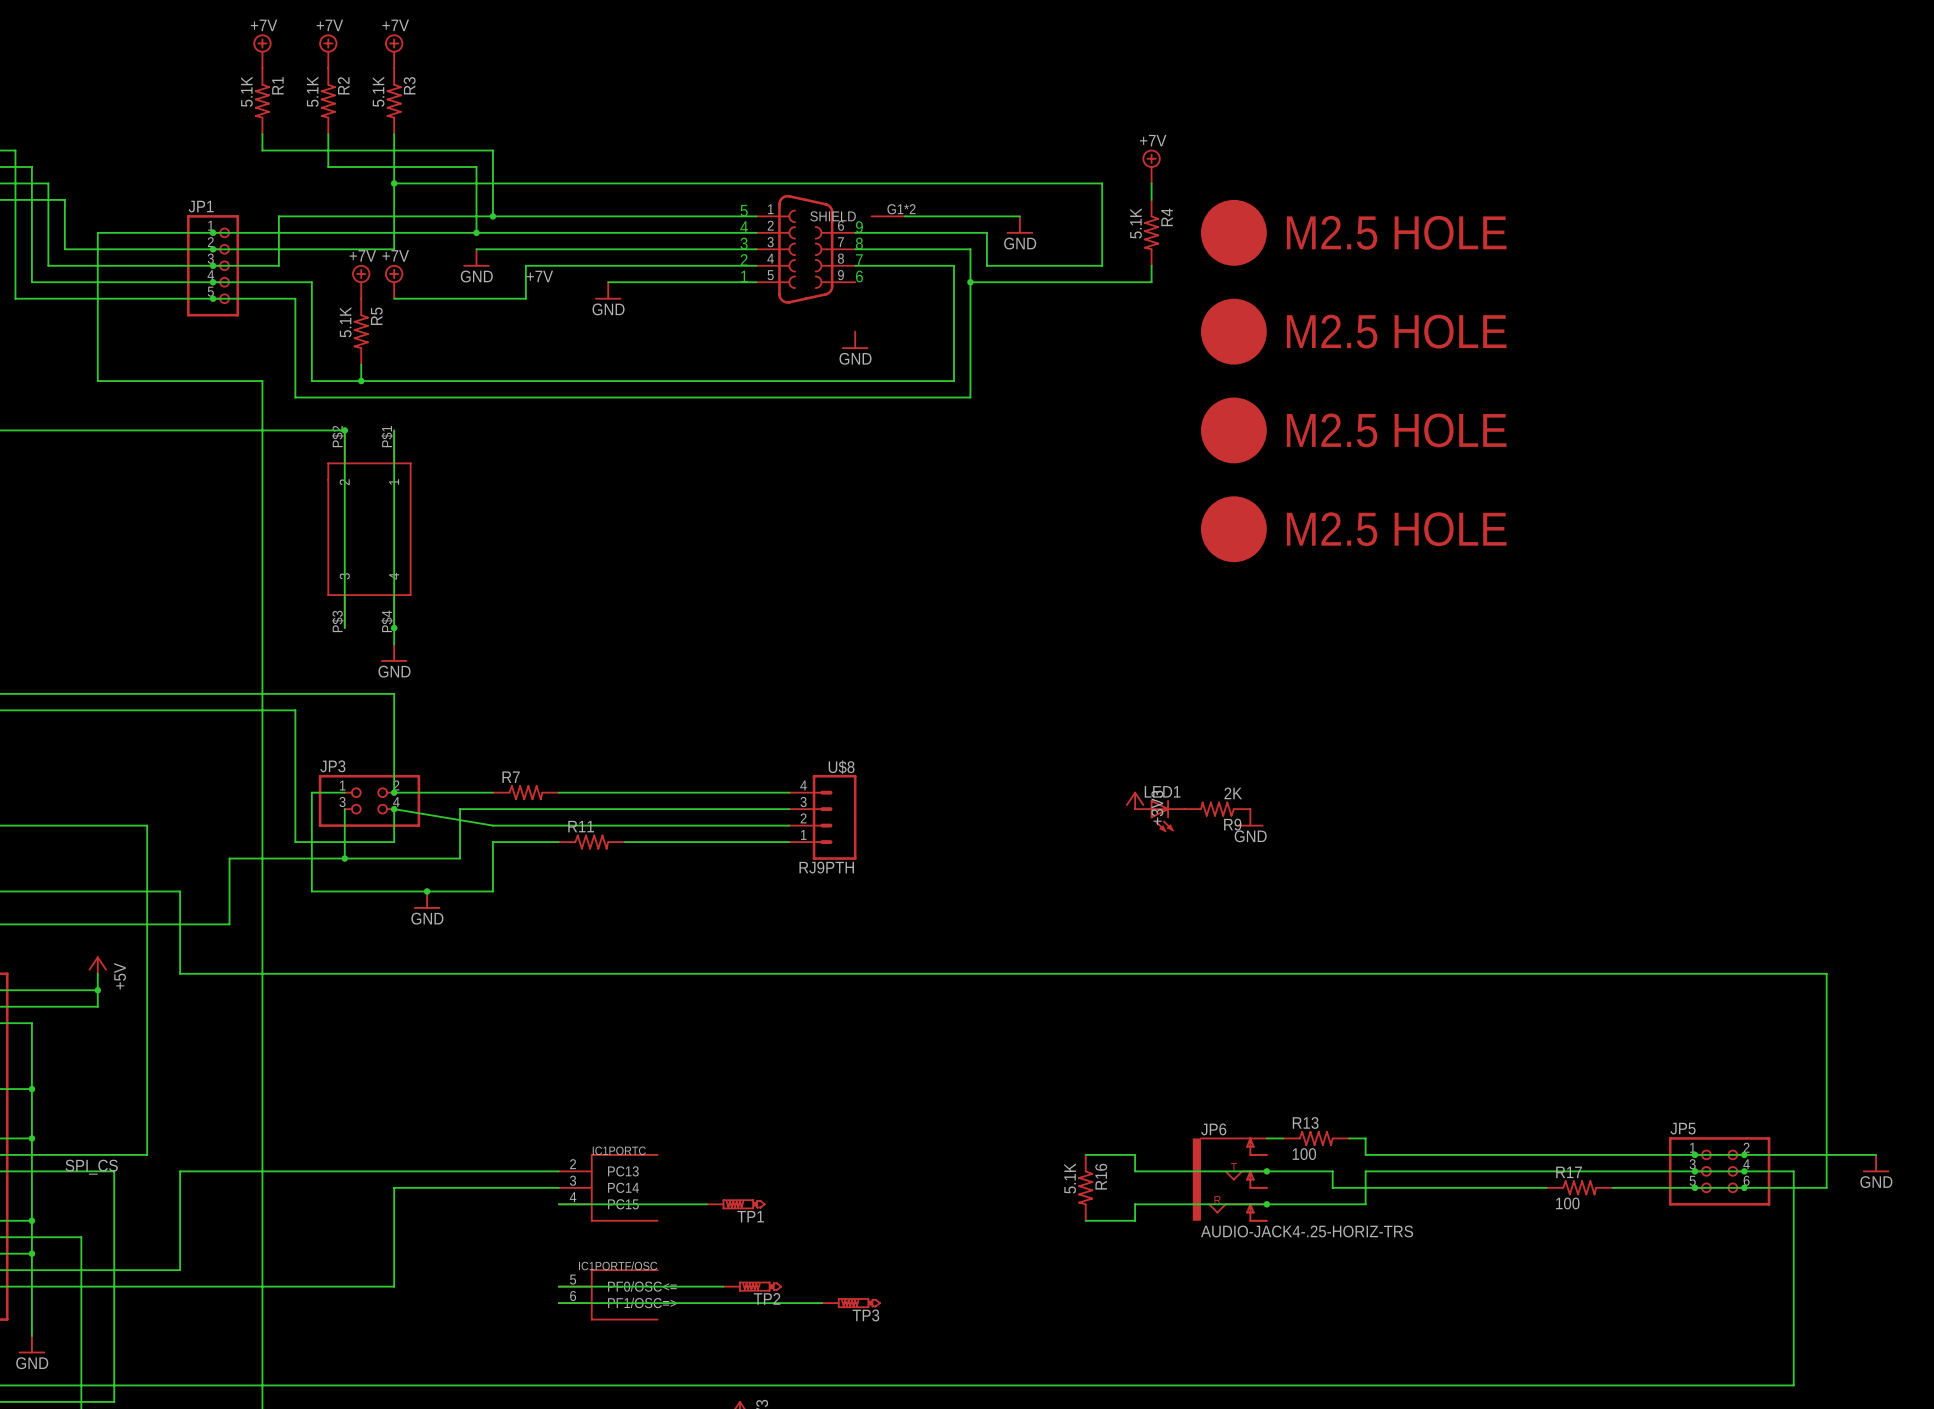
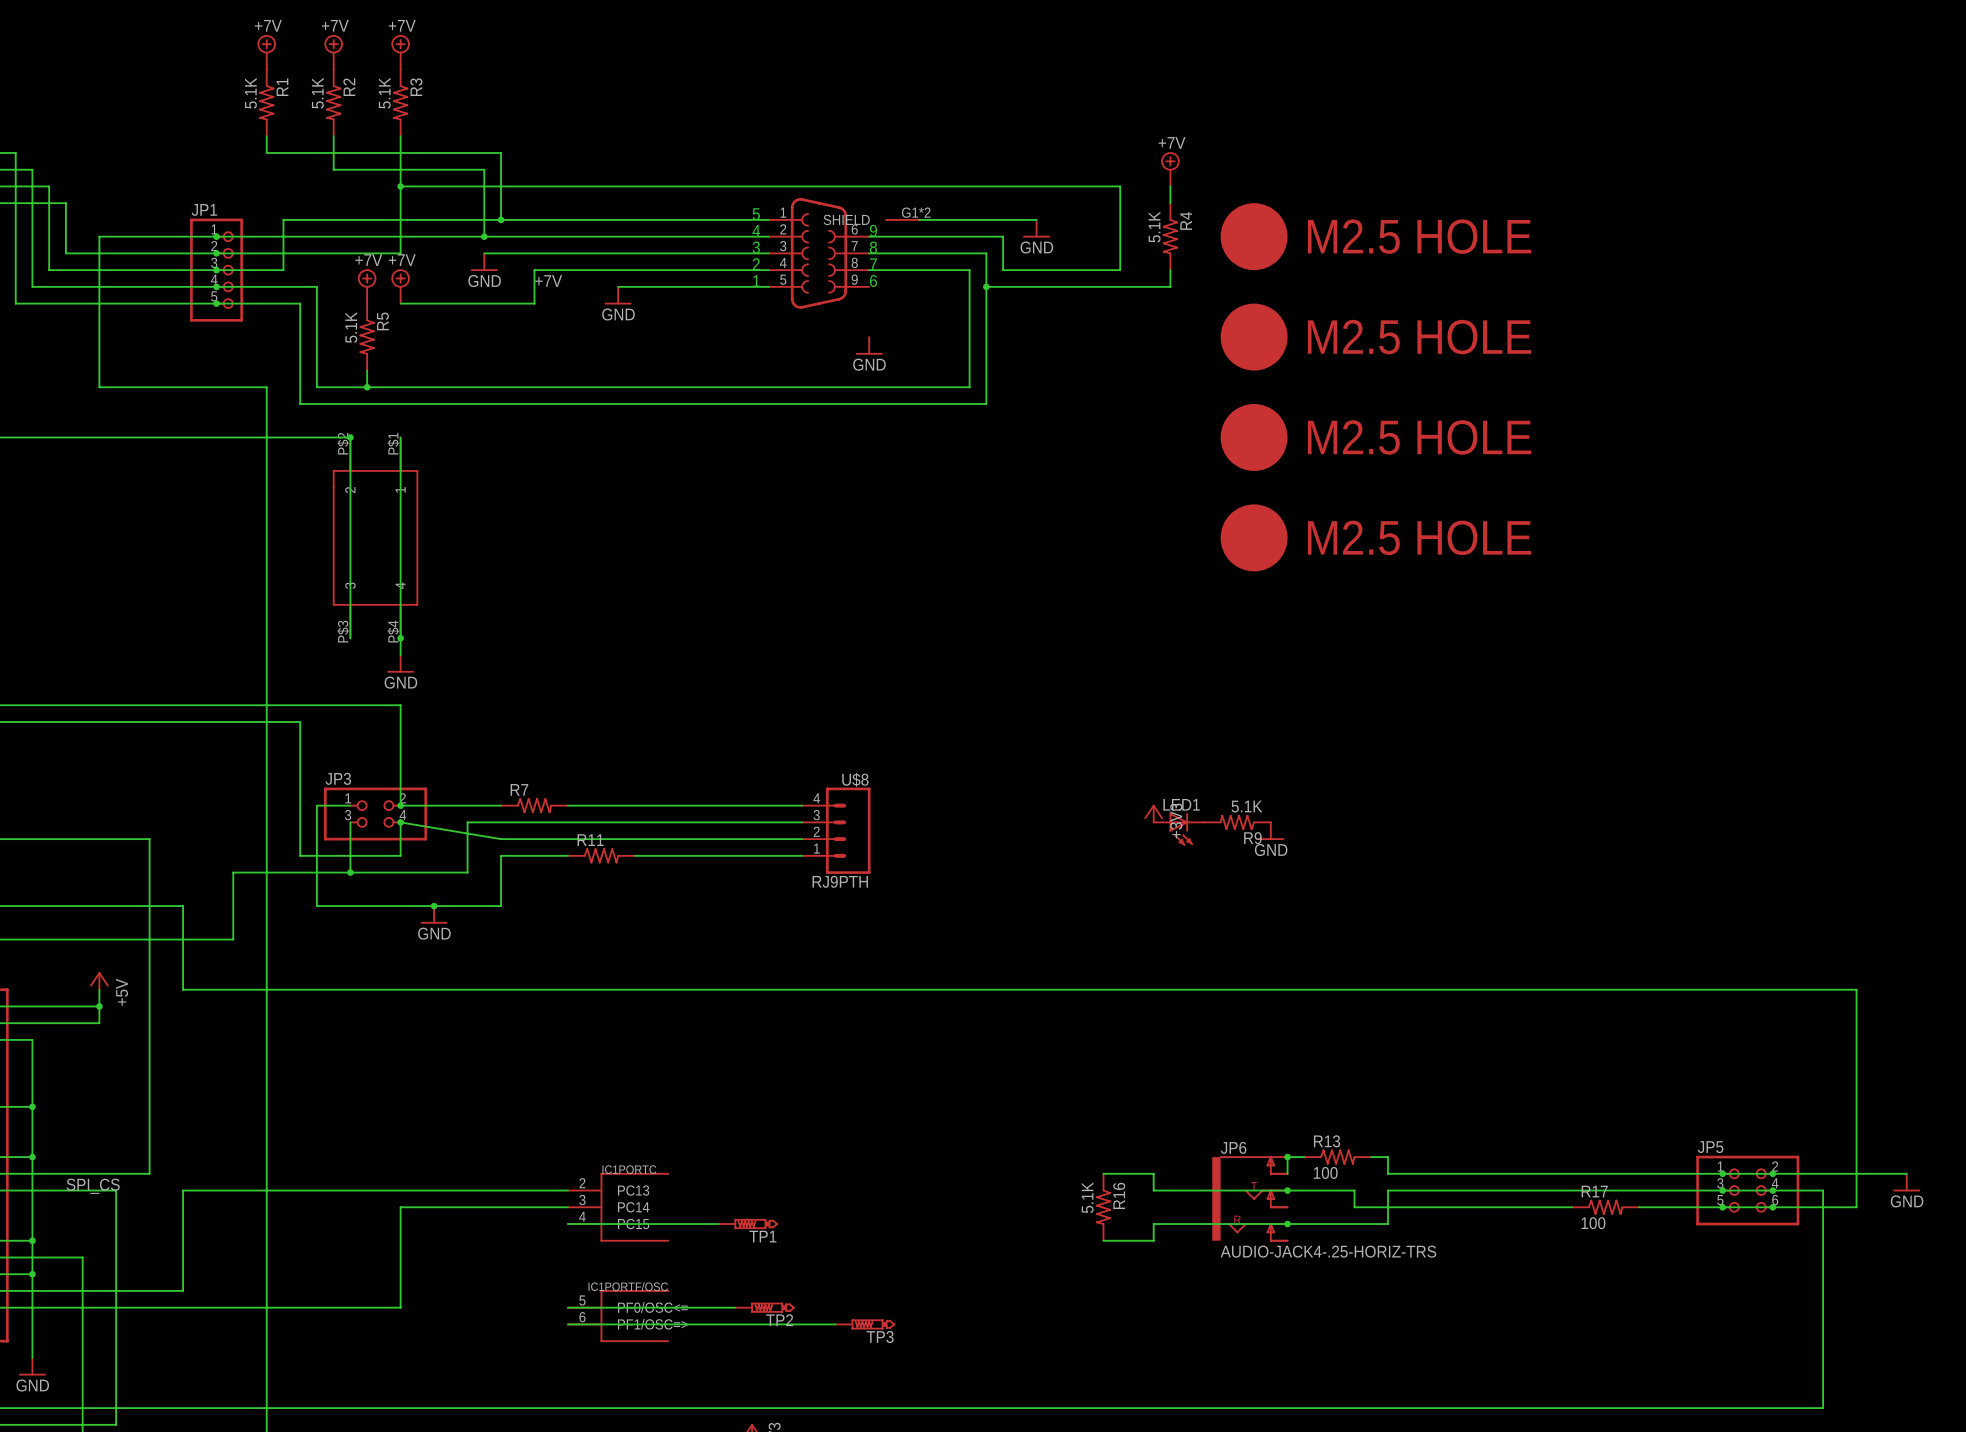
R9 value: 2K (1233, 793) -> 5.1K (1246, 806)
wire: none -> (1287, 1157) (1287, 1173)
junction: none -> (1287, 1157)

